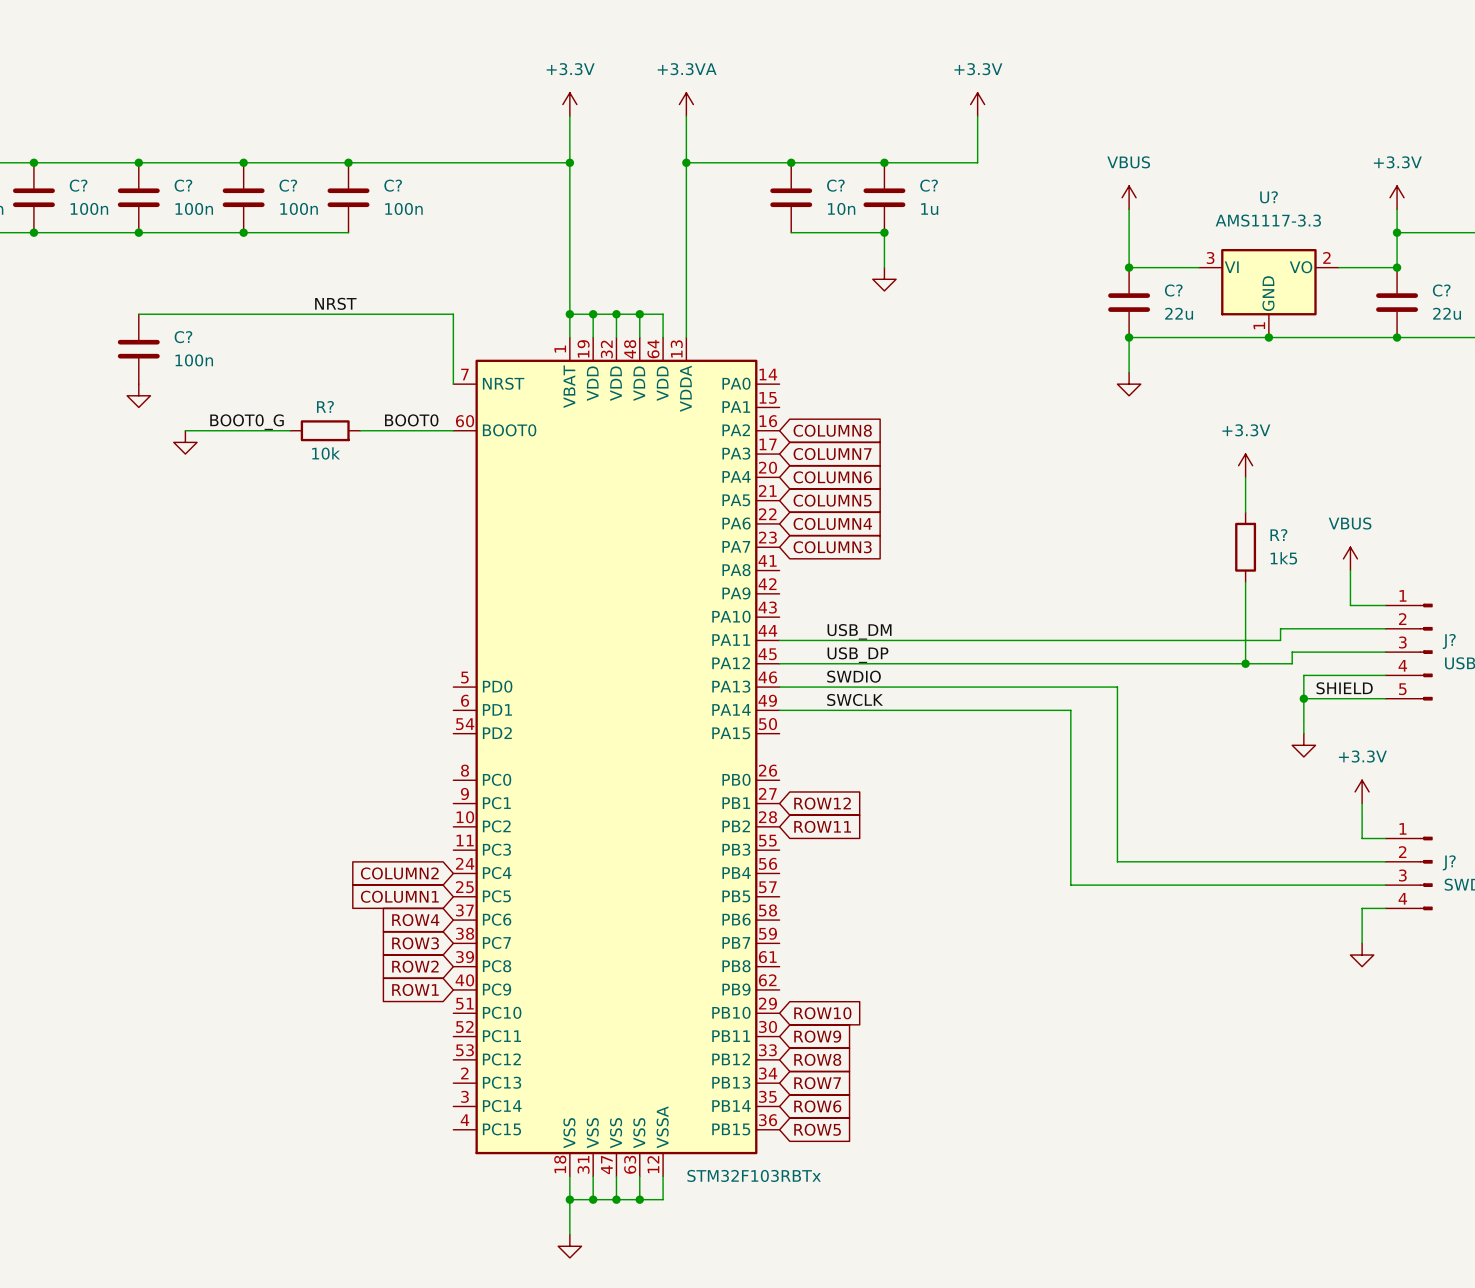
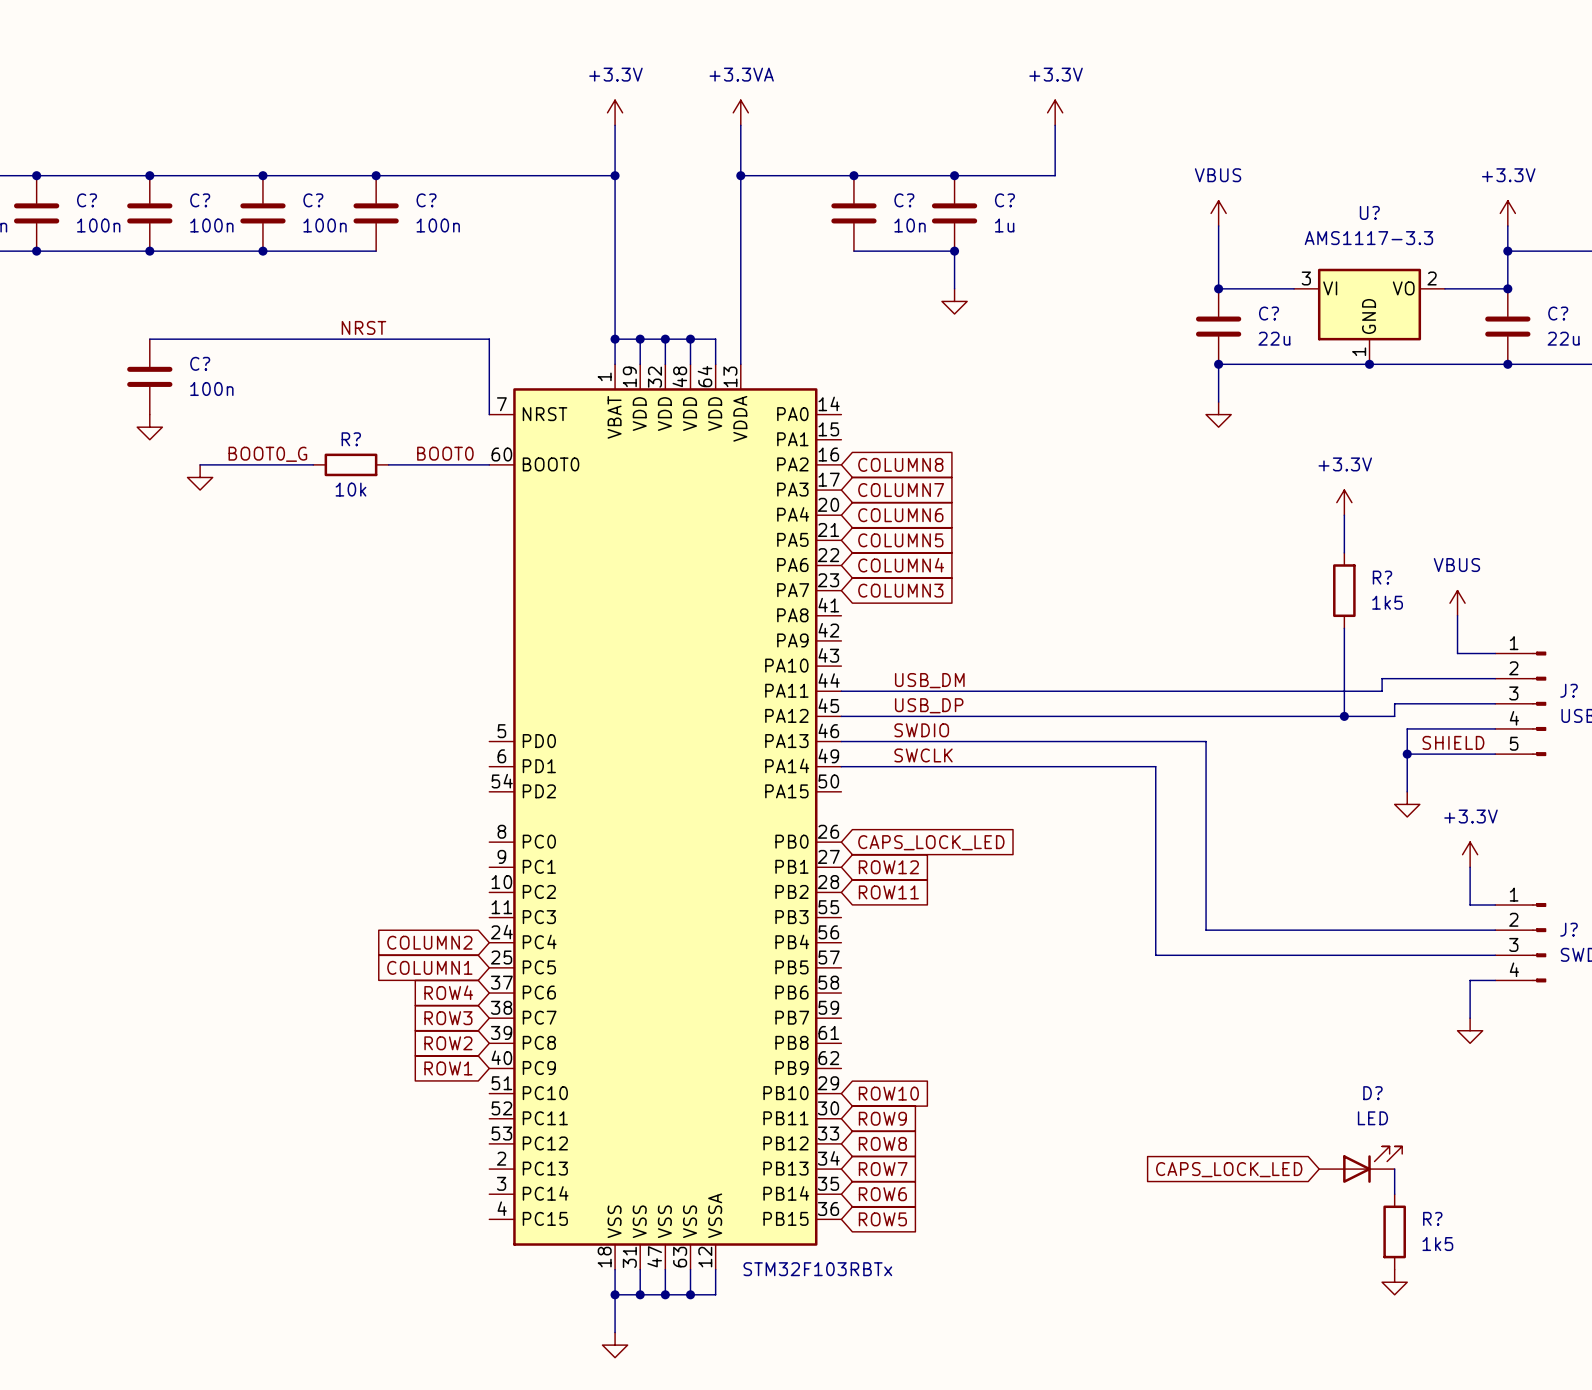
global label: none -> CAPS_LOCK_LED (931, 842)
D?: none -> LED (1360, 1164)
wire: none -> (1394, 1169) (1394, 1194)
global label: none -> CAPS_LOCK_LED (1229, 1169)
R?: none -> 1k5 (1394, 1231)
power symbol: none -> (1394, 1282)

